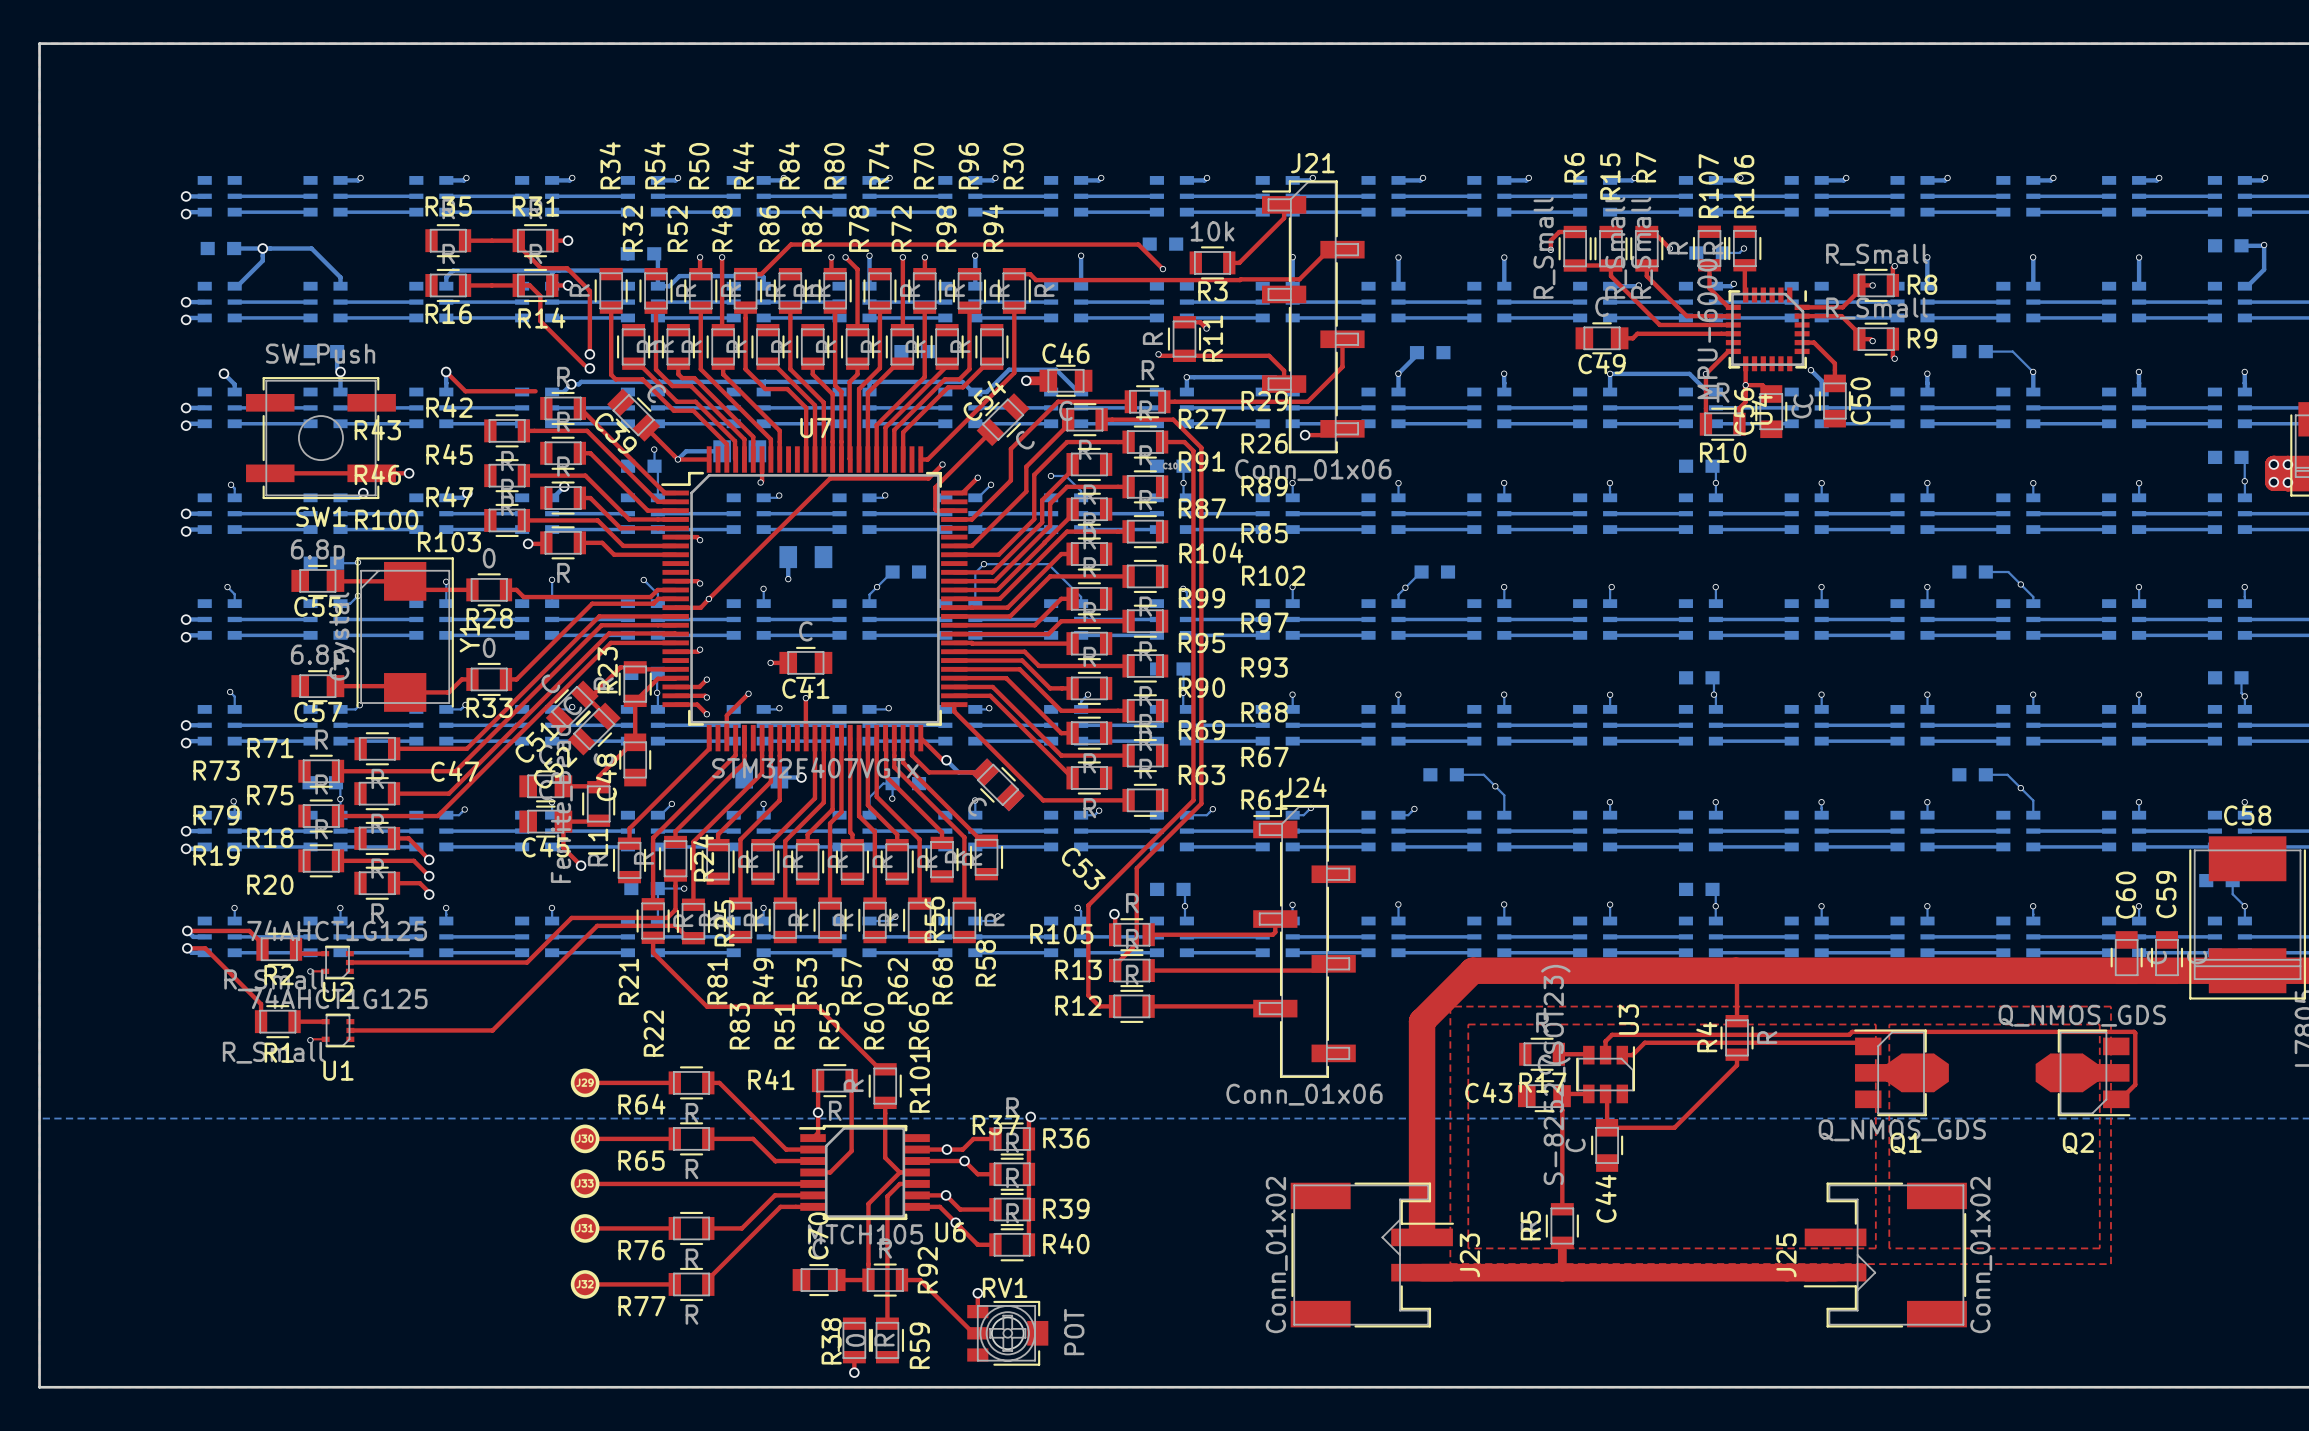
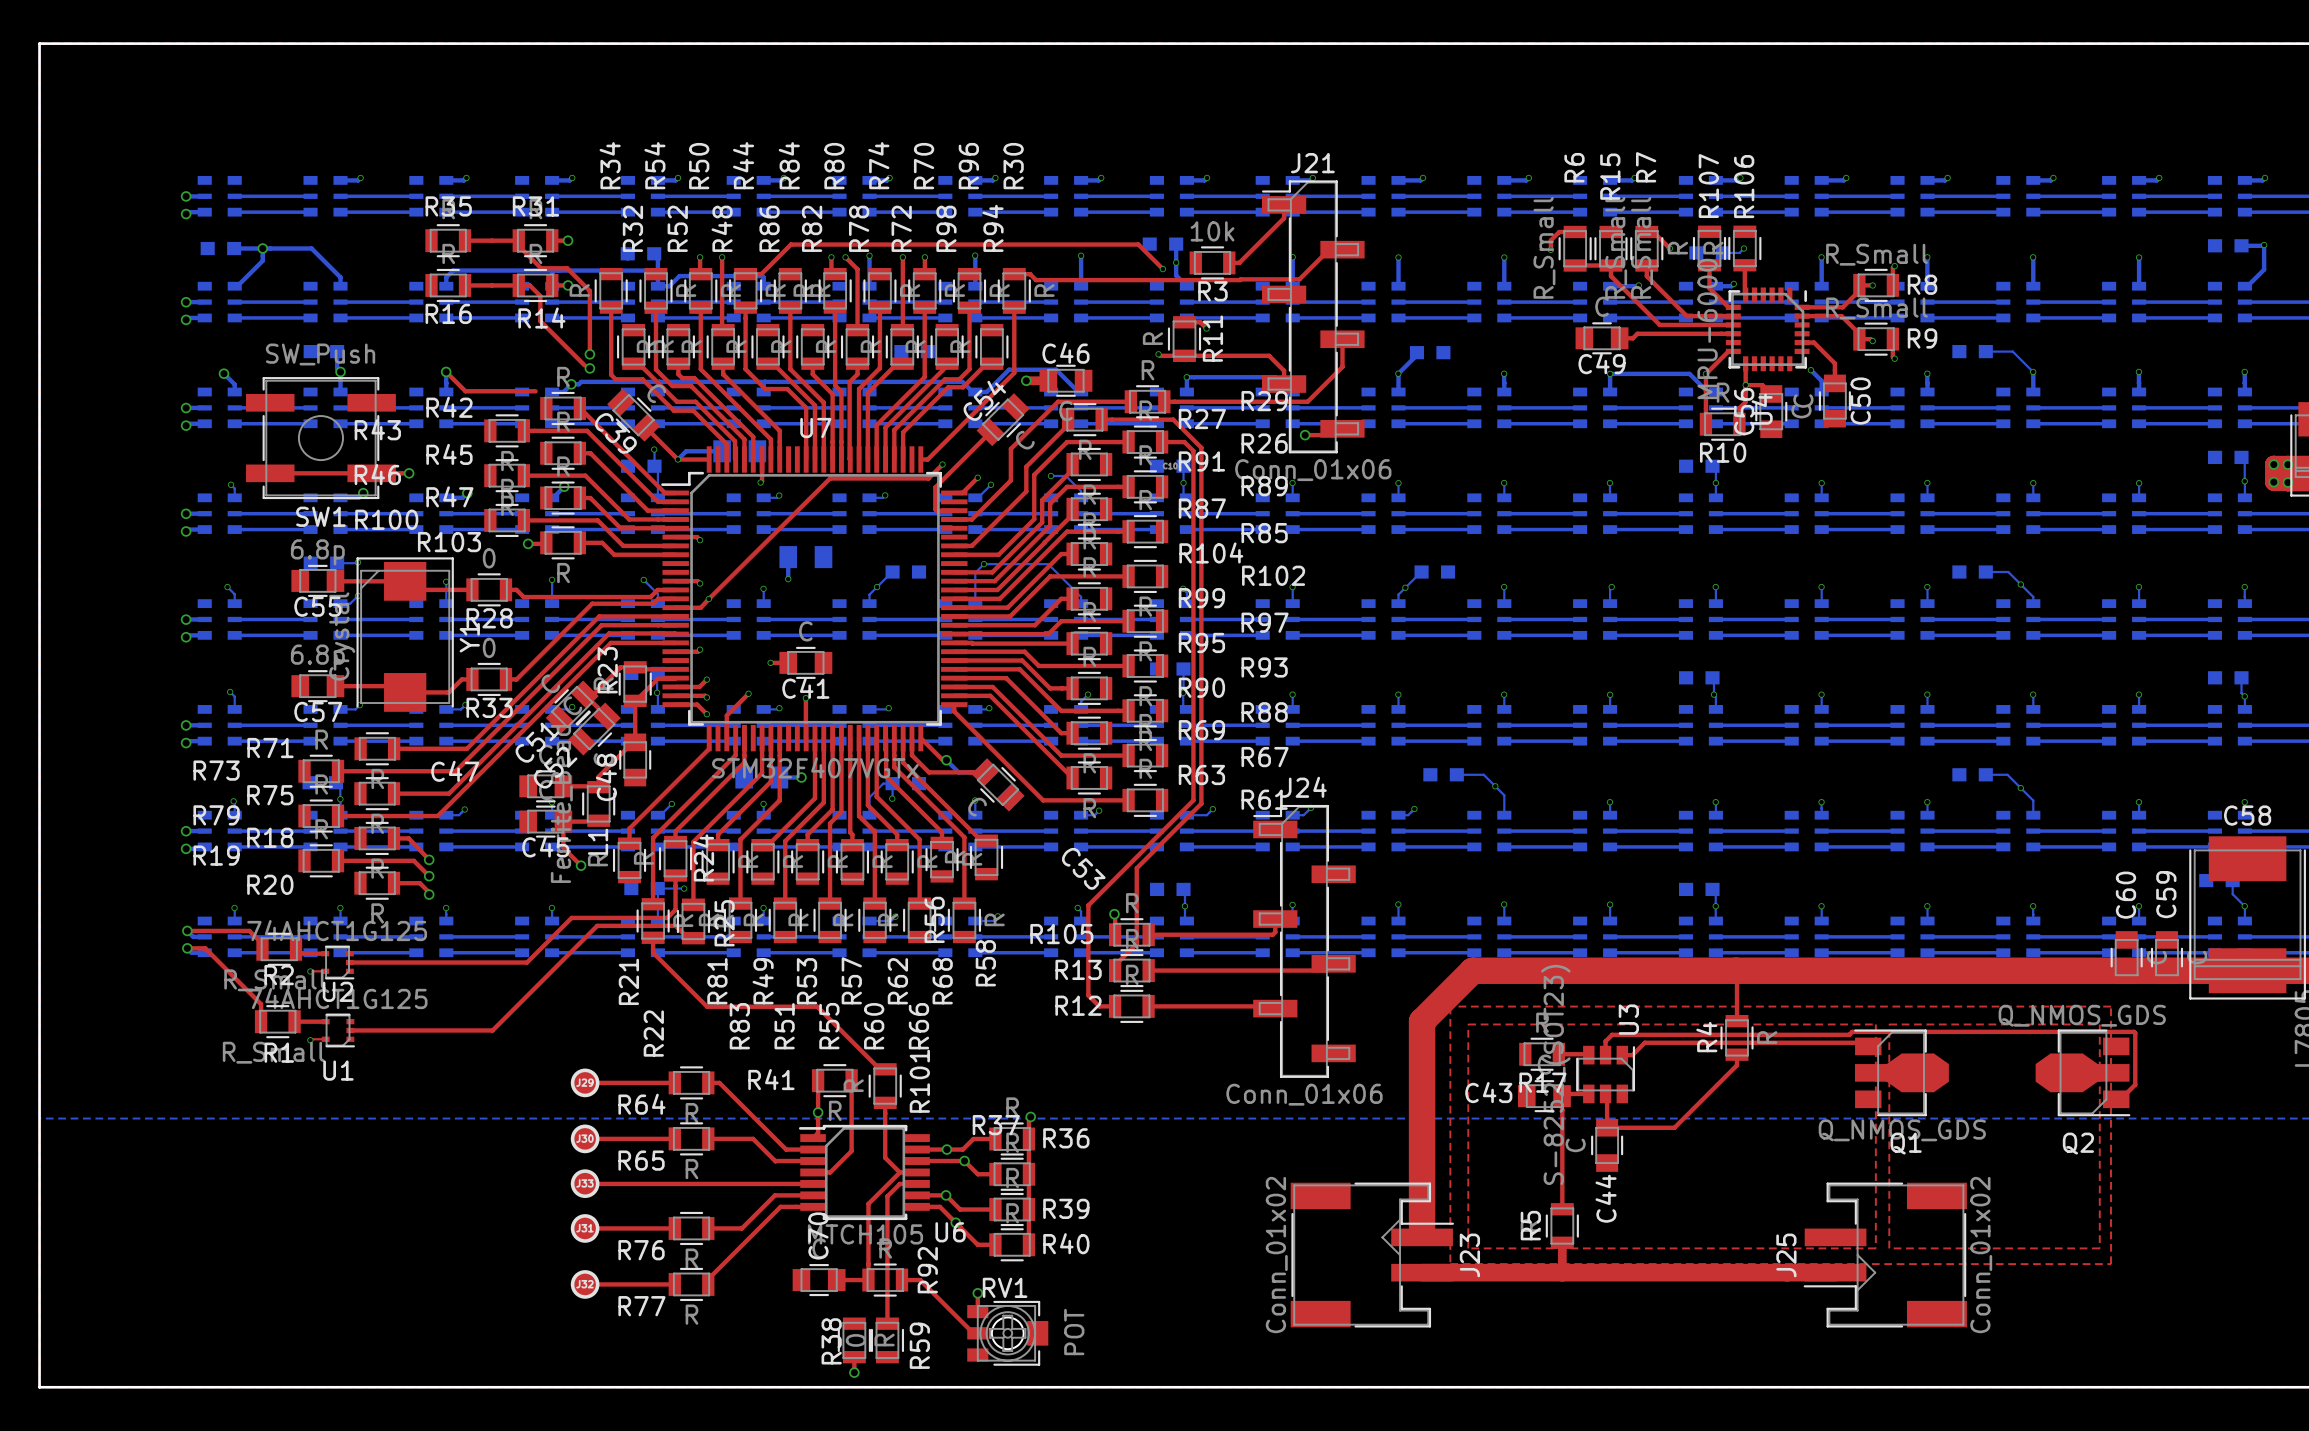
bottom track: none -> (1176, 244) (1176, 275) (1186, 286)
bottom track: none -> (1821, 257) (1821, 286)
via: none -> (1821, 257)
via: none -> (1176, 262)

